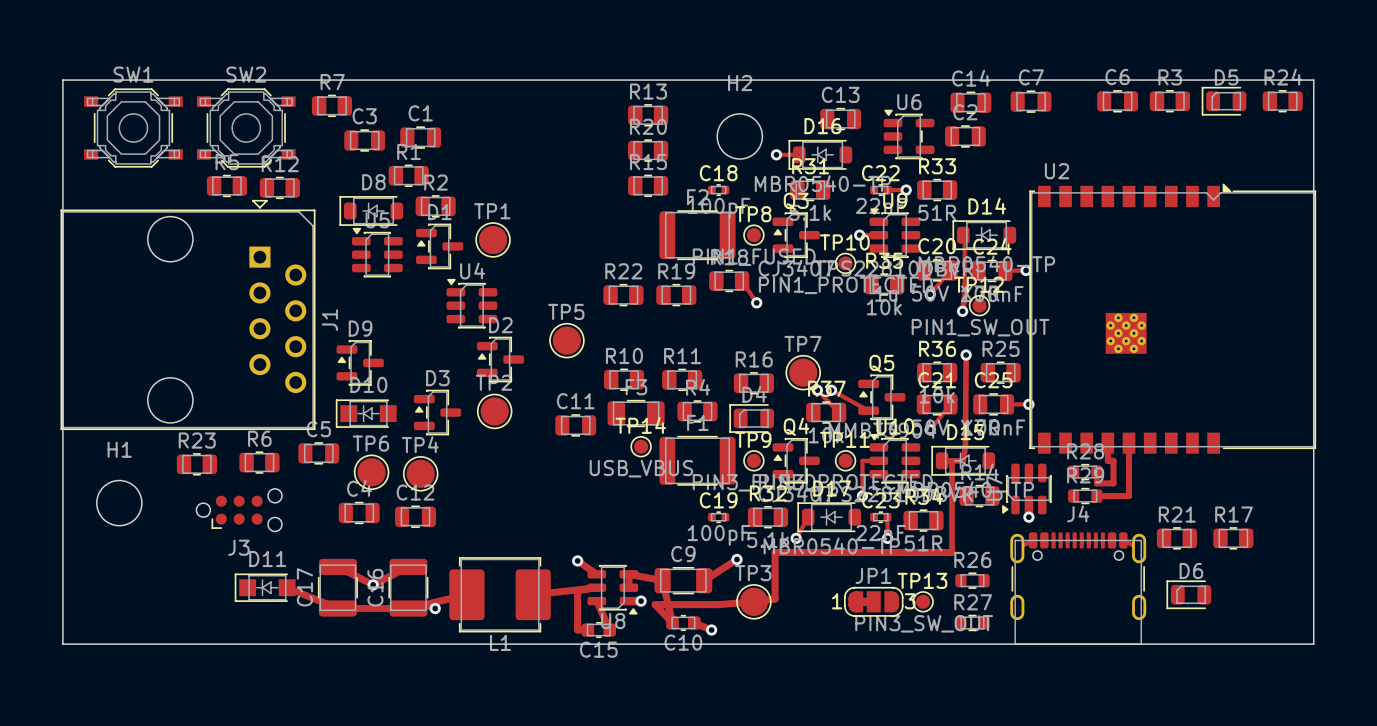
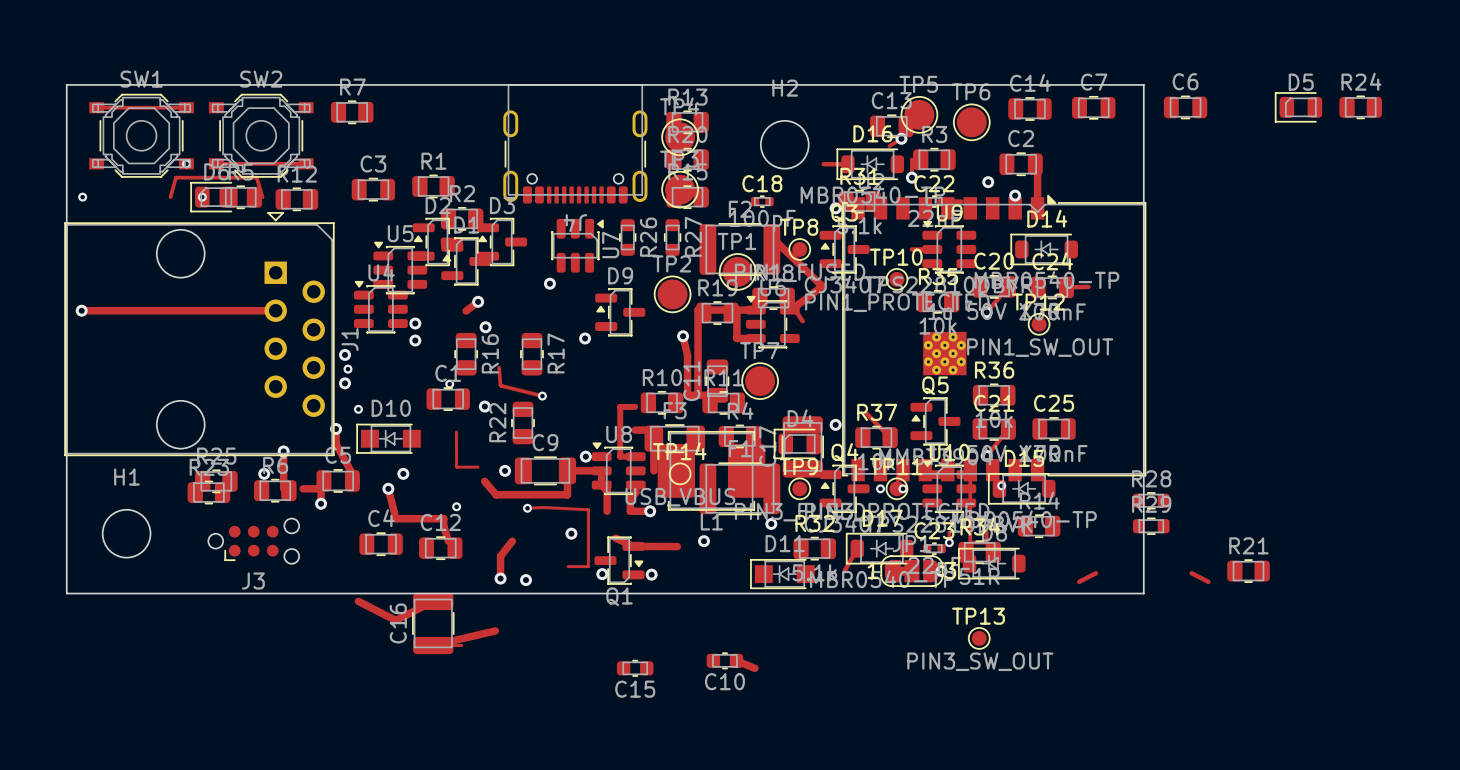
board edge: (1078, 80) (1313, 80) (1313, 644) (62, 644) (62, 559) -> (1143, 84) (1143, 593) (66, 593)
track: none -> (96, 107) (186, 107)
R3 position: (1169, 101) -> (934, 159)
track: none -> (901, 138) (889, 146)
via: none -> (901, 138)
U6 position: (909, 134) -> (772, 322)
C2 position: (965, 136) -> (1021, 164)
C1 position: (420, 137) -> (448, 399)
C3 position: (364, 140) -> (373, 189)
track: none -> (920, 159) (911, 159) (911, 177)
via: none -> (186, 163)
track: none -> (216, 163) (306, 163)
via: (776, 154) -> none
track: none -> (1035, 164) (1037, 164) (1037, 208)
via: none -> (911, 177)
via: none -> (988, 182)
via: none -> (1015, 195)
via: none -> (82, 197)
track: none -> (170, 197) (175, 177) (256, 177) (262, 197)
via: none -> (202, 197)
via: (906, 190) -> none
R33: 51R (937, 190) -> none
via: none -> (835, 208)
D8 position: (371, 210) -> (991, 563)
track: none -> (777, 242) (822, 286) (789, 310)
via: (859, 235) -> none
track: (963, 235) (965, 291) (962, 311) -> none
TP1 position: (493, 239) -> (737, 271)
via: none -> (549, 283)
via: (1026, 270) -> none
R22 name position: R22 (623, 271) -> R22 (497, 422)
track: none -> (478, 301) (466, 311)
via: none -> (478, 301)
track: none -> (81, 310) (275, 310)
via: none -> (81, 310)
track: none -> (736, 310) (736, 338) (755, 338)
track: none -> (755, 310) (698, 310) (698, 395)
R22 rotation: 0° (623, 295) -> 90° clockwise (523, 423)
R22 position: (623, 295) -> (523, 423)
via: (756, 302) -> none
U4 position: (471, 303) -> (380, 307)
via: none -> (415, 323)
via: none -> (485, 327)
via: (962, 311) -> none
track: none -> (683, 336) (687, 355) (687, 395) (717, 395)
via: none -> (683, 336)
U2 position: (1172, 318) -> (994, 338)
via: none -> (585, 338)
via: none -> (415, 340)
via: none -> (344, 354)
TP5 position: (566, 340) -> (919, 114)
track: none -> (499, 367) (500, 385) (542, 396)
via: none -> (347, 369)
track: (966, 355) (965, 446) (963, 460) (942, 460) -> none
via: (966, 355) -> none
D2 position: (500, 359) -> (437, 242)
via: none -> (344, 383)
D9 position: (360, 362) -> (620, 312)
via: none -> (449, 384)
TP7 position: (803, 372) -> (760, 381)
R25 position: (1000, 372) -> (216, 481)
via: none -> (542, 396)
via: none -> (484, 406)
track: none -> (635, 406) (620, 406) (620, 456) (635, 456)
R16 rotation: 0° (753, 383) -> 90° clockwise (466, 354)
R16 position: (753, 383) -> (466, 354)
via: none -> (358, 409)
via: (817, 390) -> none
track: (831, 390) (868, 410) -> none
via: (831, 390) -> none
via: none -> (835, 424)
C11 name position: C11 (575, 401) -> C11 (691, 381)
track: none -> (336, 428) (336, 443) (356, 481)
via: none -> (336, 428)
track: (1007, 404) (1028, 404) -> none
via: (1028, 404) -> none
track: none -> (635, 430) (653, 430) (653, 470)
track: none -> (456, 431) (456, 467) (478, 467)
TP2 position: (494, 411) -> (672, 294)
D3 position: (437, 412) -> (502, 242)
track: none -> (283, 451) (283, 488)
via: none -> (283, 451)
C11 rotation: 0° (575, 425) -> 90° clockwise (717, 381)
C11 position: (575, 425) -> (717, 381)
via: none -> (585, 456)
via: none -> (505, 470)
track: none -> (970, 470) (970, 542) (986, 542) (986, 532)
track: (1107, 443) (1107, 460) (1113, 460) (1113, 483) (1096, 483) (1096, 472) -> none
track: (1129, 443) (1129, 496) (1096, 496) -> none
via: none -> (264, 473)
via: none -> (403, 473)
track: none -> (484, 481) (496, 494) (567, 494) (567, 470) (601, 470) (601, 485) (607, 491) (607, 511)
track: none -> (635, 485) (635, 492) (630, 498) (630, 511) (650, 511)
via: none -> (1001, 485)
track: none -> (303, 488) (321, 488) (321, 503)
track: none -> (388, 488) (395, 518) (443, 518) (443, 526) (448, 541)
via: none -> (388, 488)
via: none -> (880, 488)
via: none -> (902, 488)
track: (878, 460) (862, 460) (862, 496) -> none
track: (952, 460) (952, 552) (775, 552) (775, 599) (718, 604) (655, 604) (672, 622) (662, 580) (628, 574) (628, 587) -> none
TP6 position: (371, 472) -> (971, 122)
TP4 position: (420, 473) -> (680, 137)
via: none -> (321, 503)
via: none -> (456, 506)
track: none -> (527, 508) (588, 509) (588, 566) (568, 566)
via: none -> (527, 508)
via: none -> (650, 511)
U7 rotation: 0° (1026, 489) -> 180° (577, 245)
U7 position: (1026, 489) -> (577, 245)
via: none -> (771, 523)
via: (862, 496) -> none
track: none -> (949, 532) (949, 542)
via: none -> (571, 533)
track: none -> (615, 538) (633, 546) (677, 546)
track: none -> (512, 541) (500, 556) (500, 578)
via: none -> (704, 541)
via: none -> (949, 542)
C19: 100pF (718, 517) -> none
track: (887, 517) (887, 538) -> none
via: (1028, 517) -> none
Q1: none -> (619, 560)
via: (796, 538) -> none
R17 rotation: 0° (1233, 538) -> 90° clockwise (531, 354)
R17 position: (1233, 538) -> (531, 354)
via: none -> (602, 574)
via: none -> (651, 574)
via: none -> (500, 578)
via: none -> (525, 580)
track: (736, 559) (704, 580) -> none
via: (736, 559) -> none
track: (577, 560) (596, 574) -> none
via: (577, 560) -> none
C9 position: (683, 580) -> (545, 470)
R26 rotation: 0° (972, 580) -> 90° clockwise (627, 237)
R26 position: (972, 580) -> (627, 237)
via: (373, 584) -> none
D11 position: (265, 587) -> (782, 574)
track: (287, 587) (337, 608) (408, 608) -> none
C17 position: (337, 587) -> (802, 446)
J4 rotation: 0° (1078, 588) -> 180° (575, 143)
J4 position: (1078, 588) -> (575, 143)
U8 rotation: 0° (612, 589) -> 180° (618, 468)
U8 position: (612, 589) -> (618, 468)
L1 position: (500, 594) -> (711, 470)
track: (533, 594) (596, 587) (577, 590) (577, 630) (587, 630) -> none
D6 position: (1188, 594) -> (213, 197)
track: (596, 601) (609, 630) -> none
via: (641, 601) -> none
TP3 position: (753, 601) -> (680, 189)
JP1 position: (873, 601) -> (911, 571)
via: (435, 608) -> none
R27 rotation: 0° (972, 622) -> 90° clockwise (672, 237)
R27 position: (972, 622) -> (672, 237)
via: (711, 630) -> none

